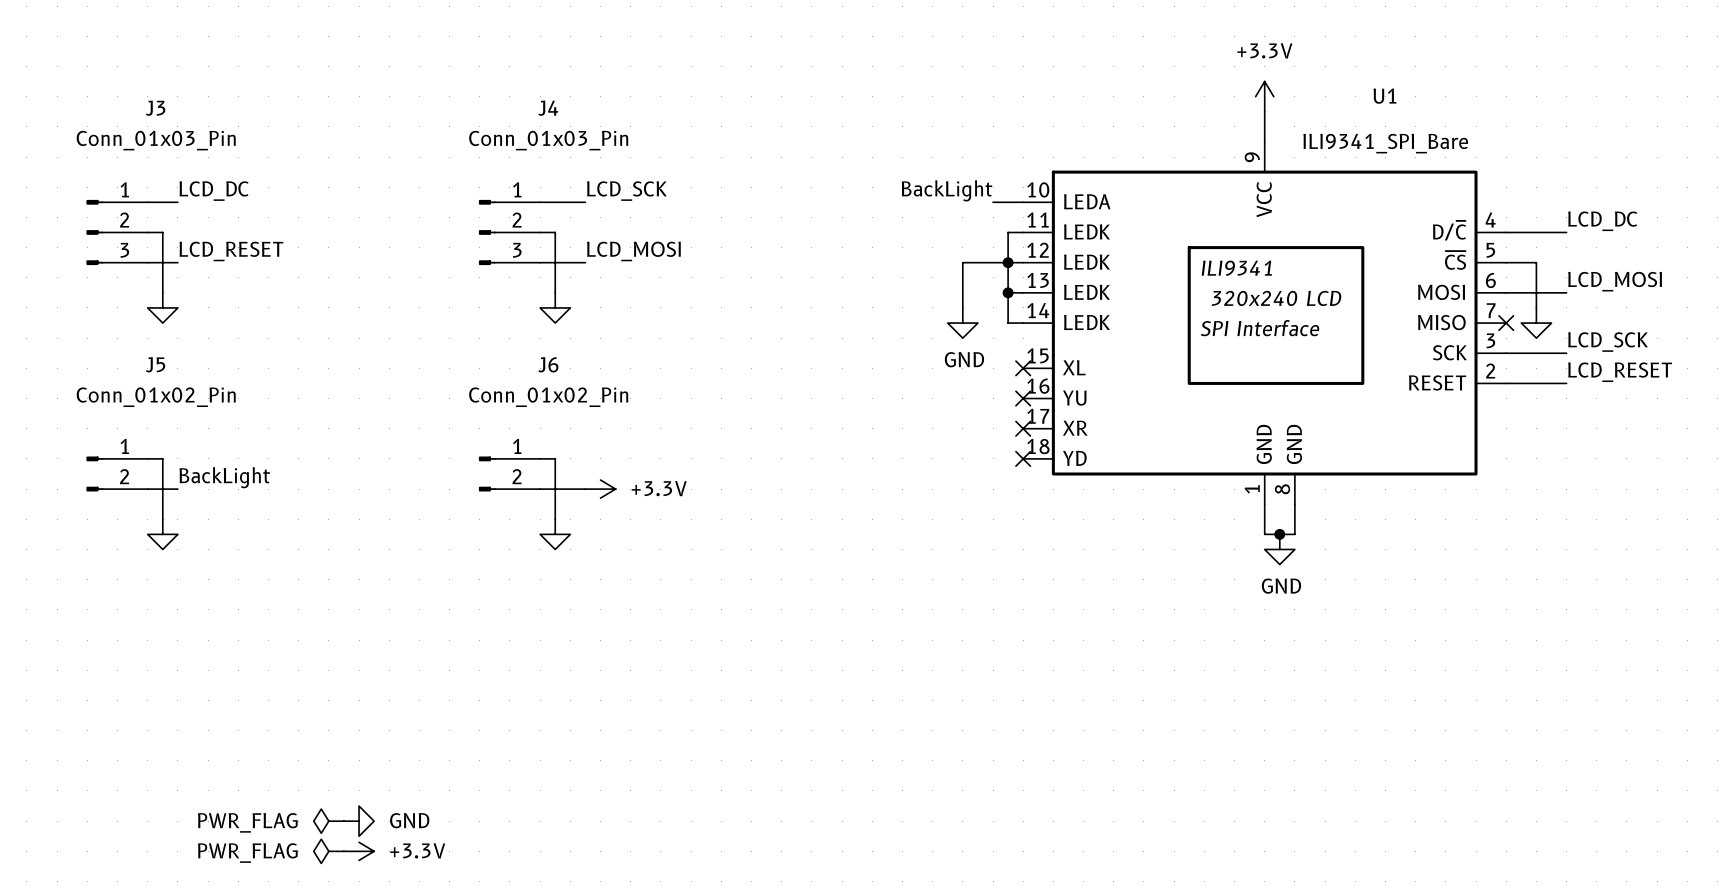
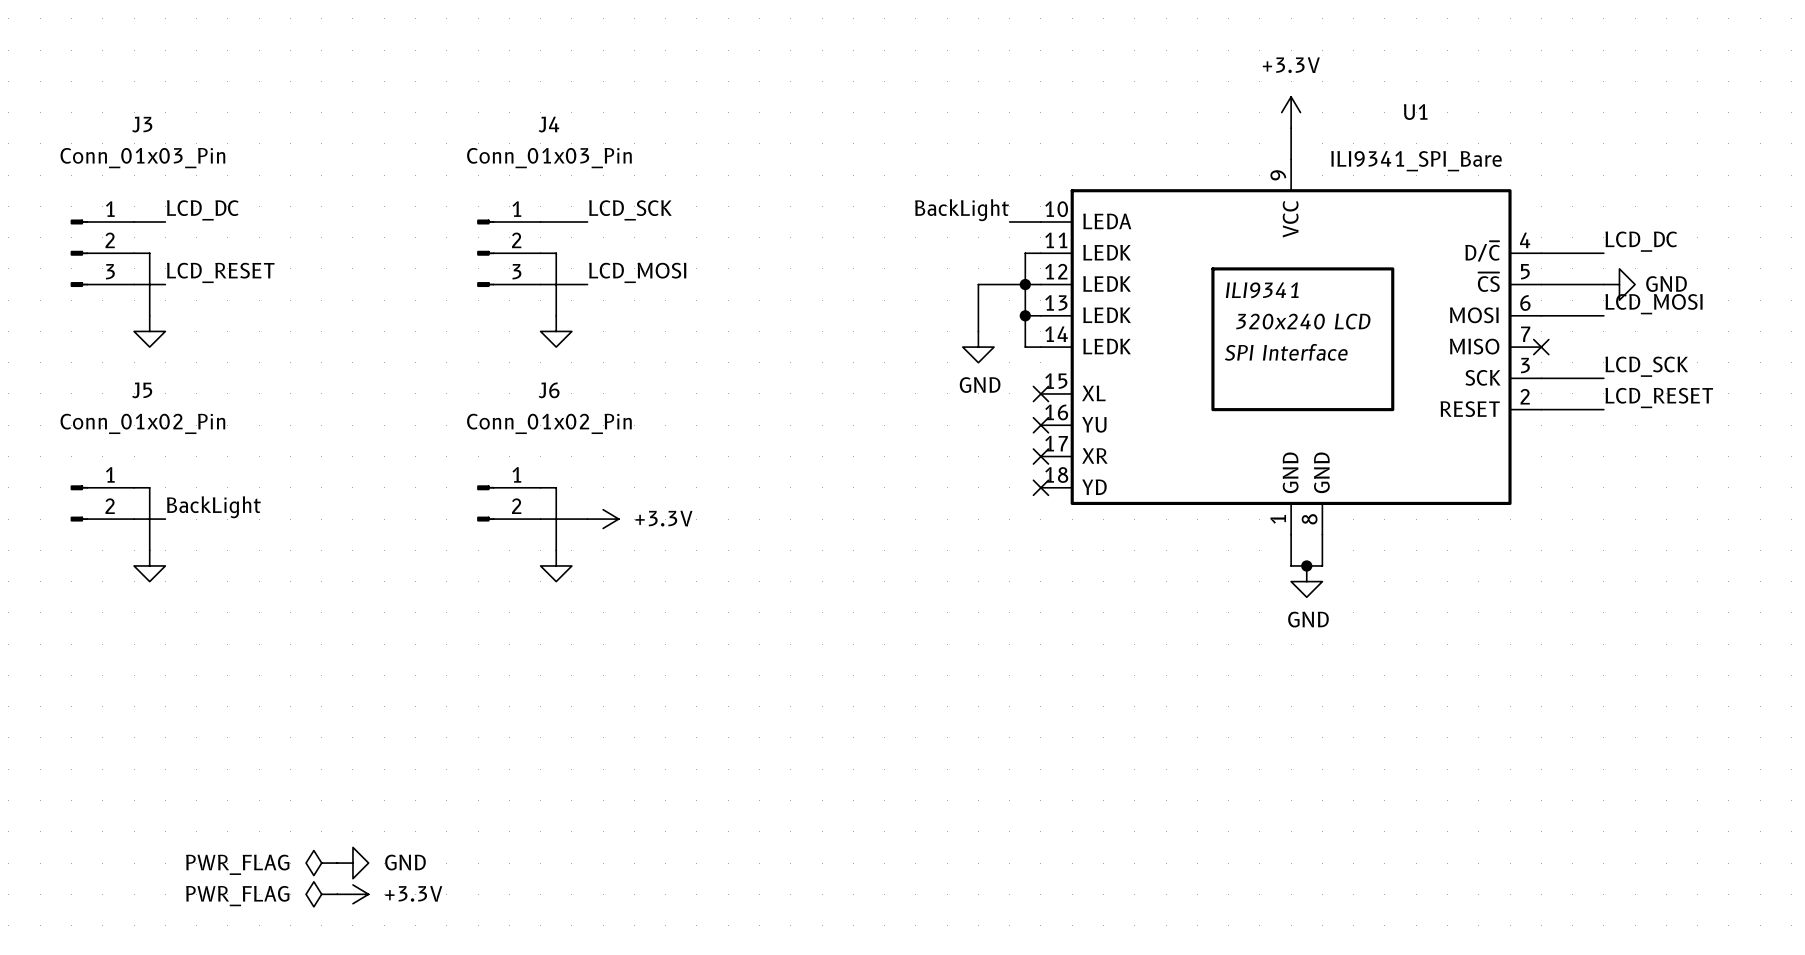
wire: (1536, 262) (1536, 307) -> (1572, 284) (1603, 284)
power symbol: none -> GND (1619, 284)
power symbol: (1536, 323) -> none

